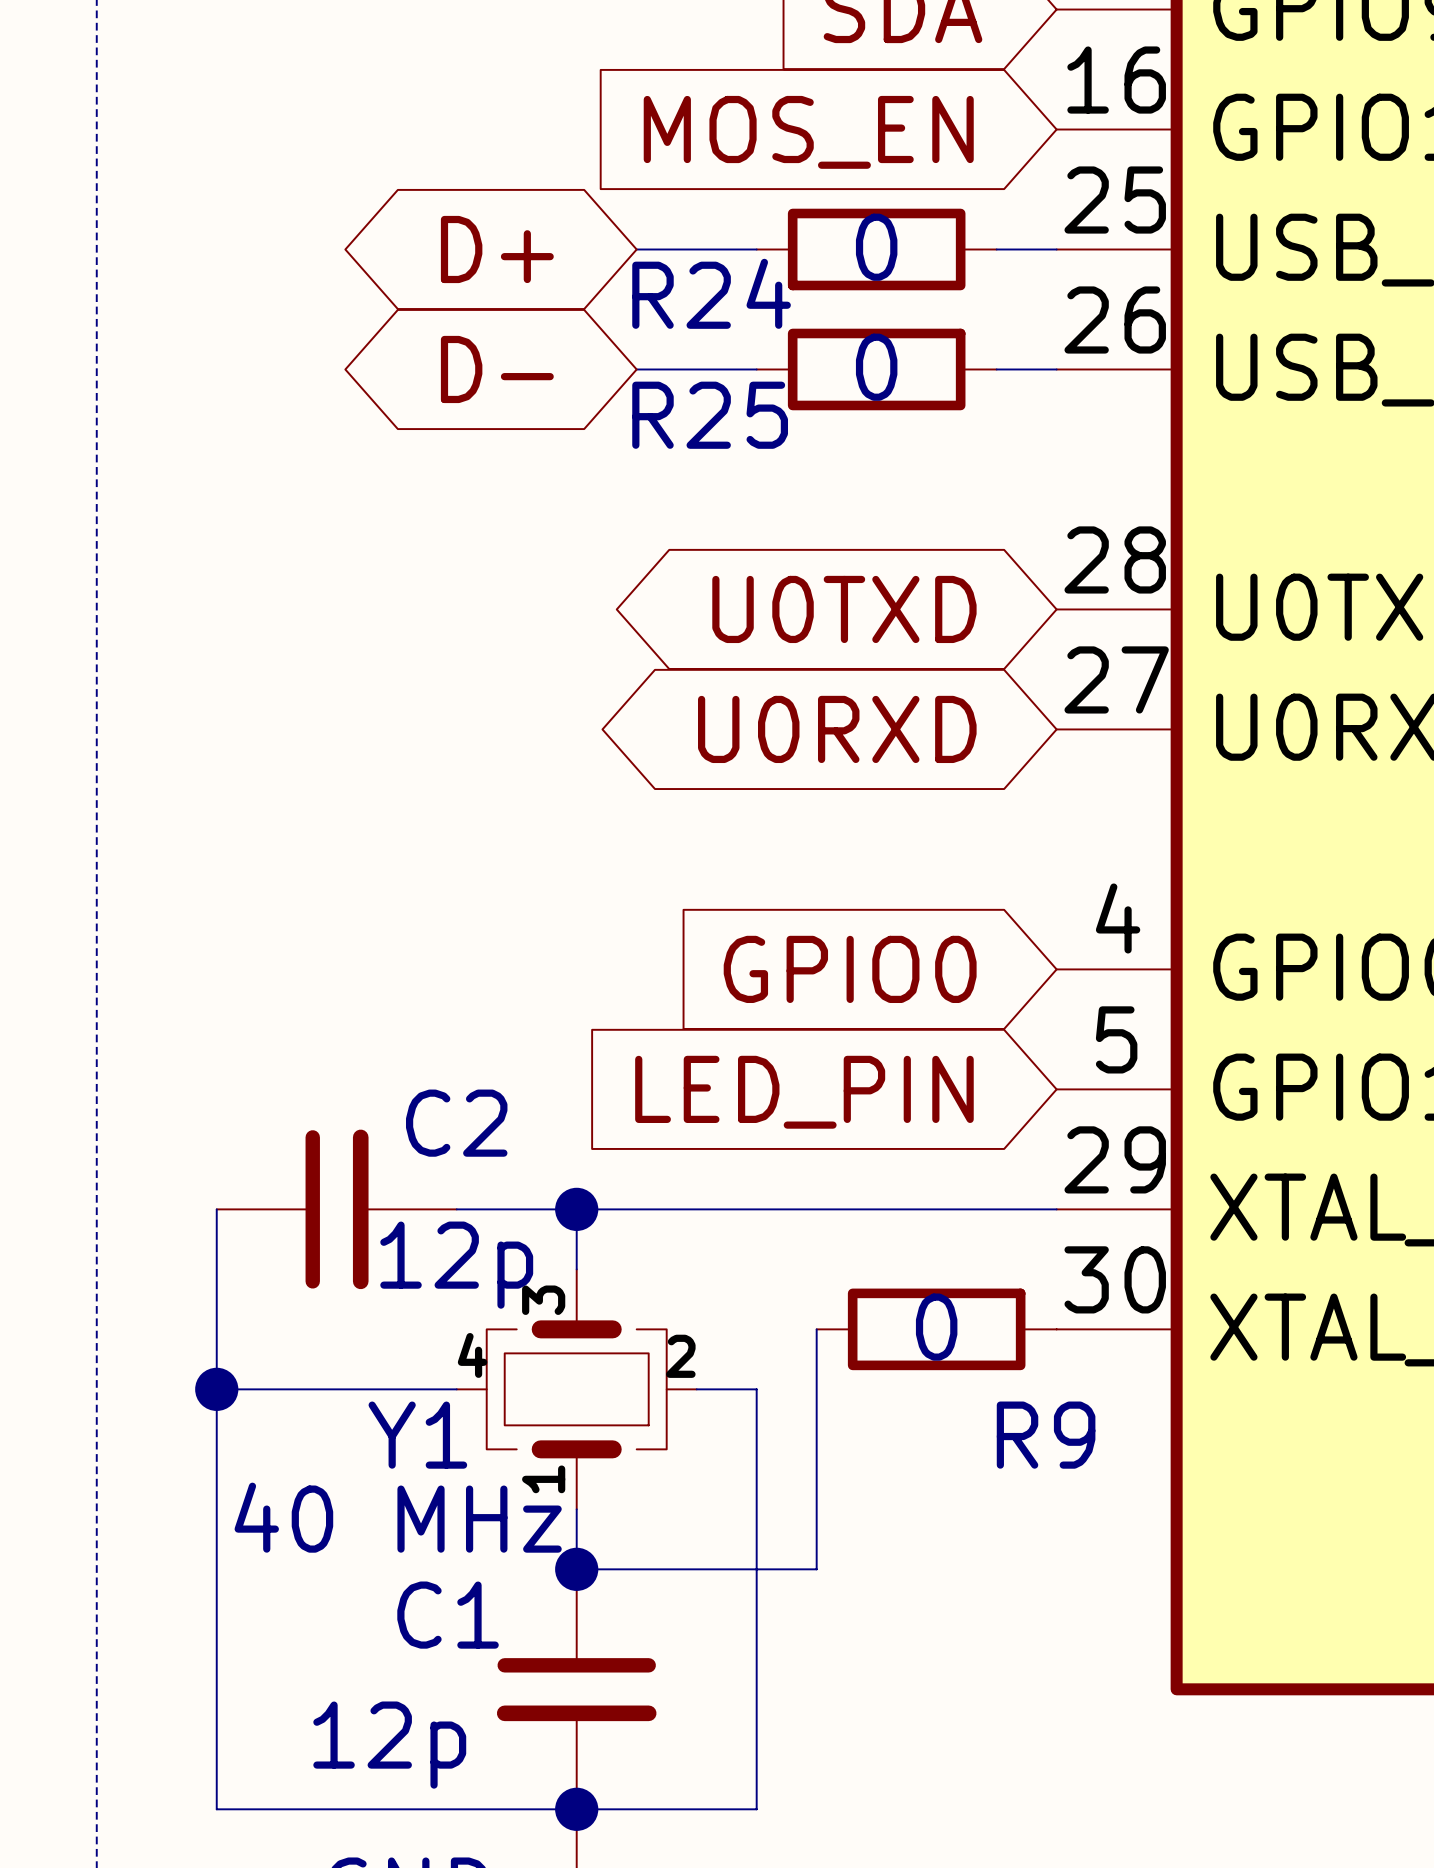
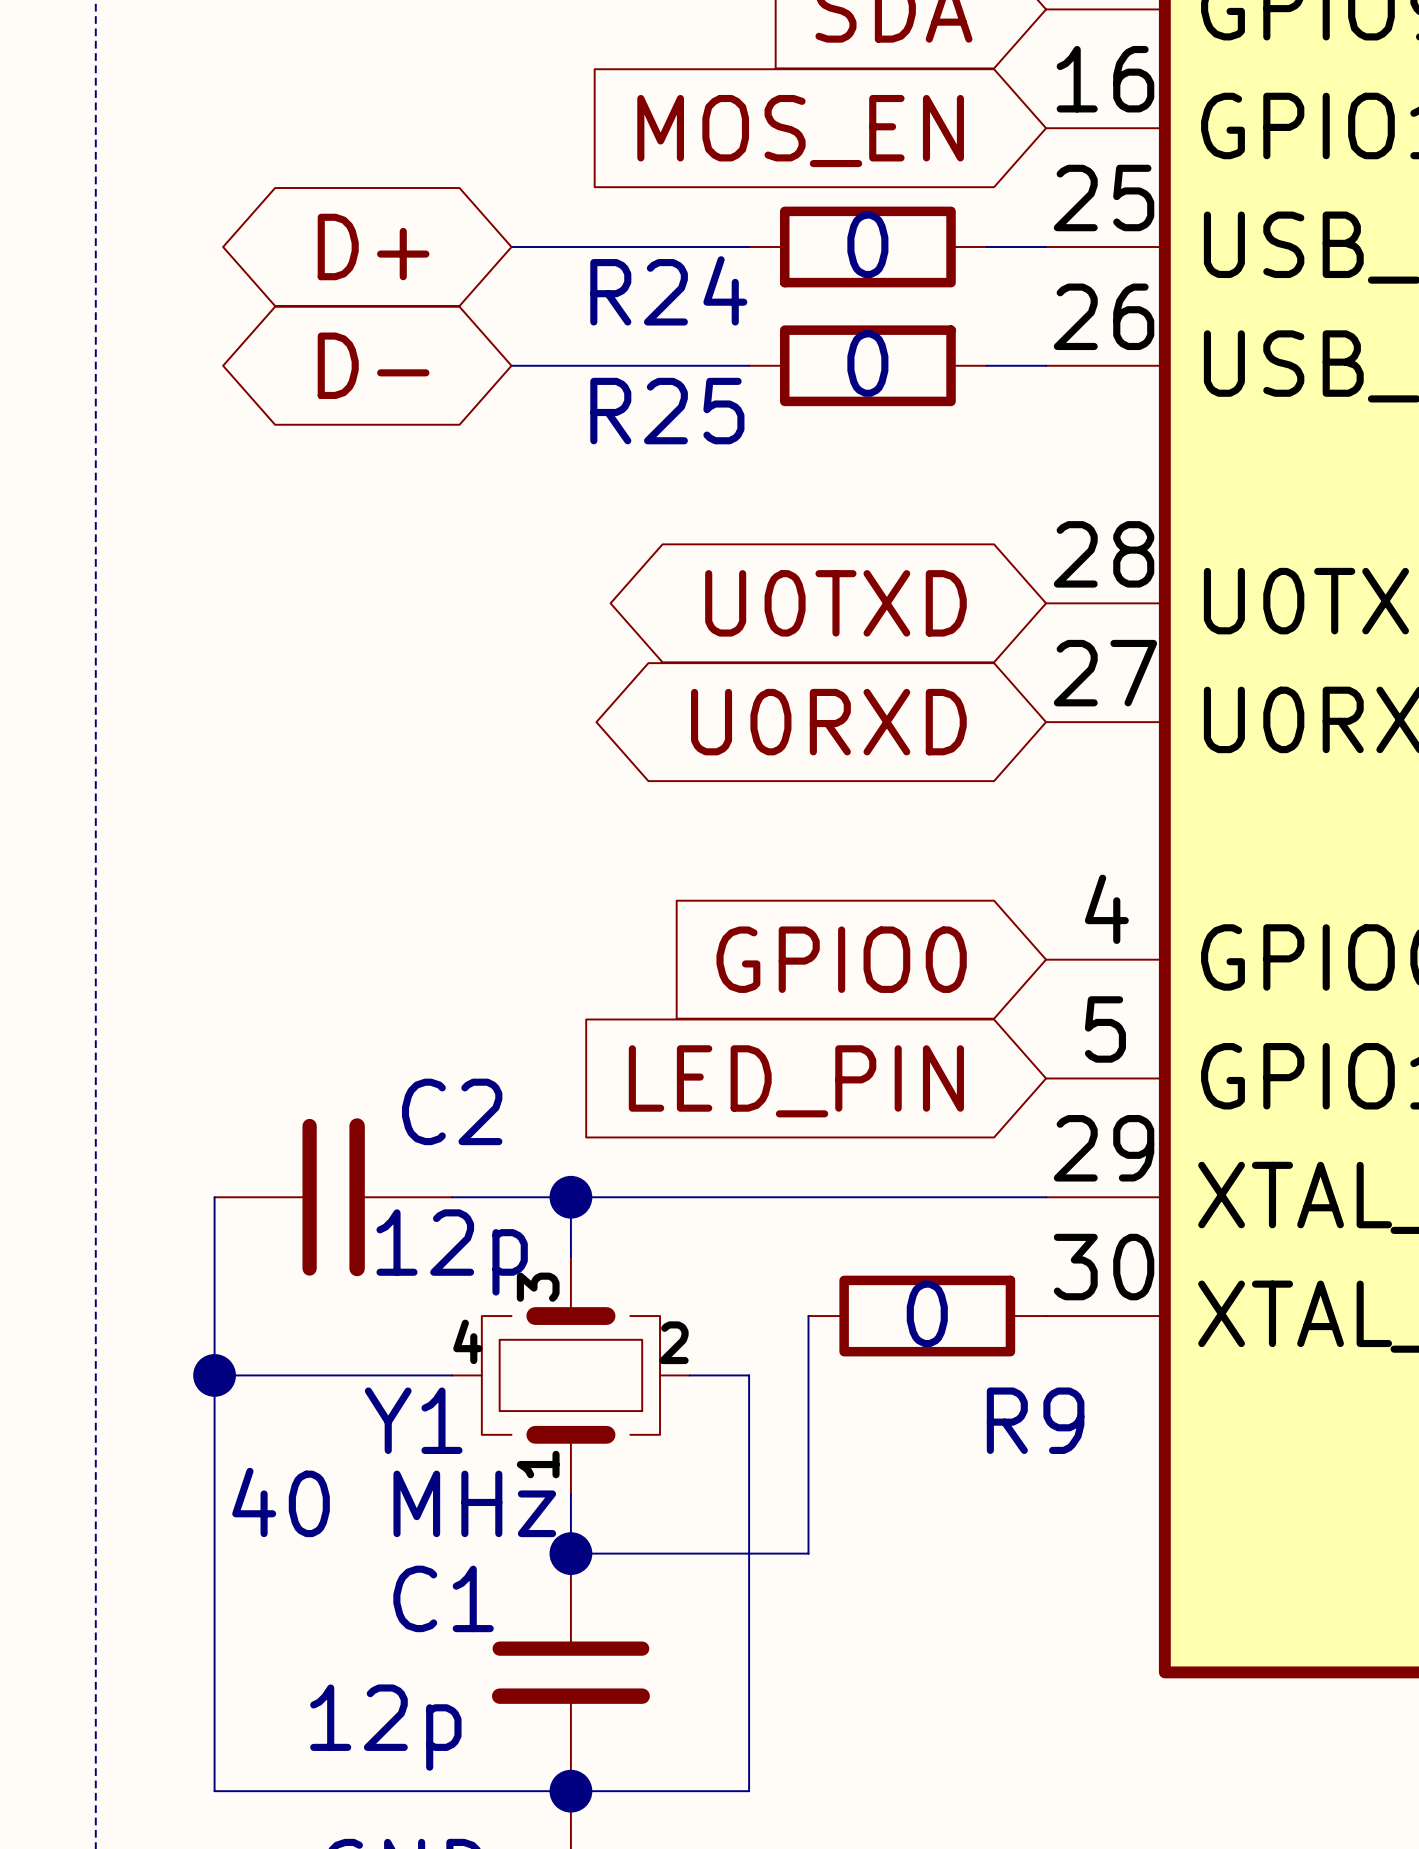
global label position: D+ (497, 249) -> D+ (373, 246)
wire: none -> (511, 246) (630, 246)
R24 name position: R24 (711, 293) -> R24 (668, 290)
global label position: D- (497, 369) -> D- (373, 365)
wire: none -> (511, 365) (630, 365)
R25 name position: R25 (710, 415) -> R25 (667, 411)

